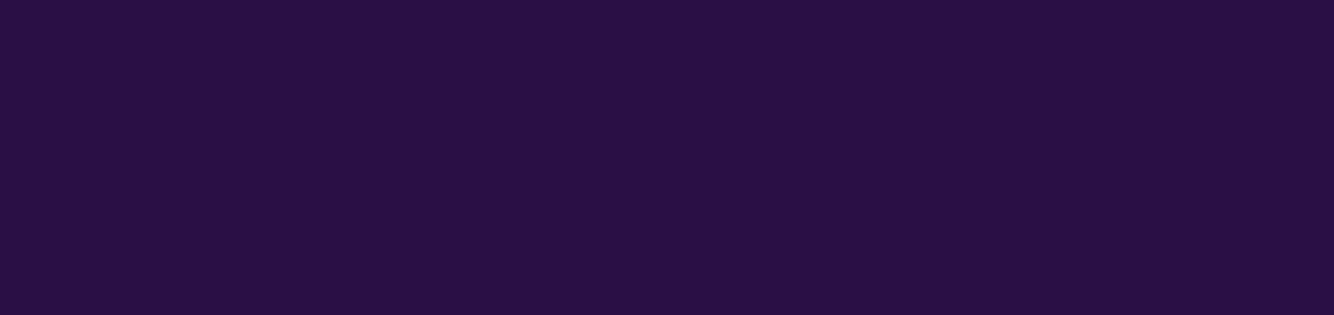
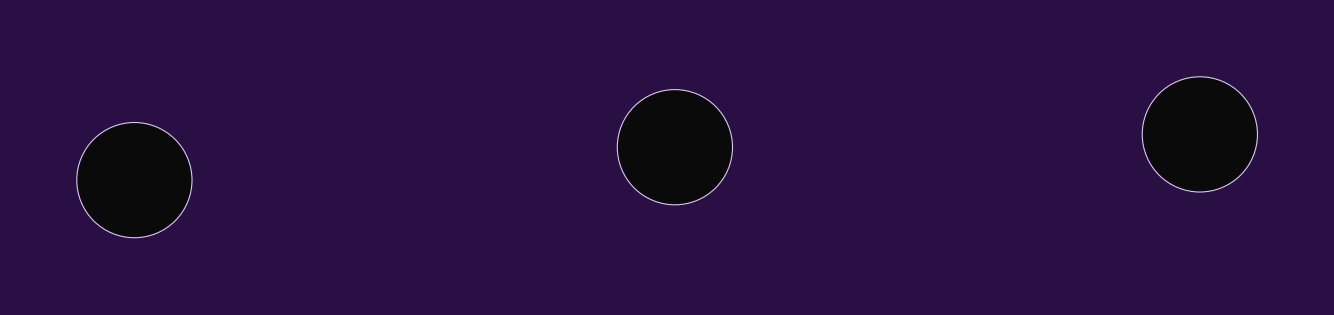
part: none -> (1199, 134)
part: none -> (674, 147)
part: none -> (134, 180)

